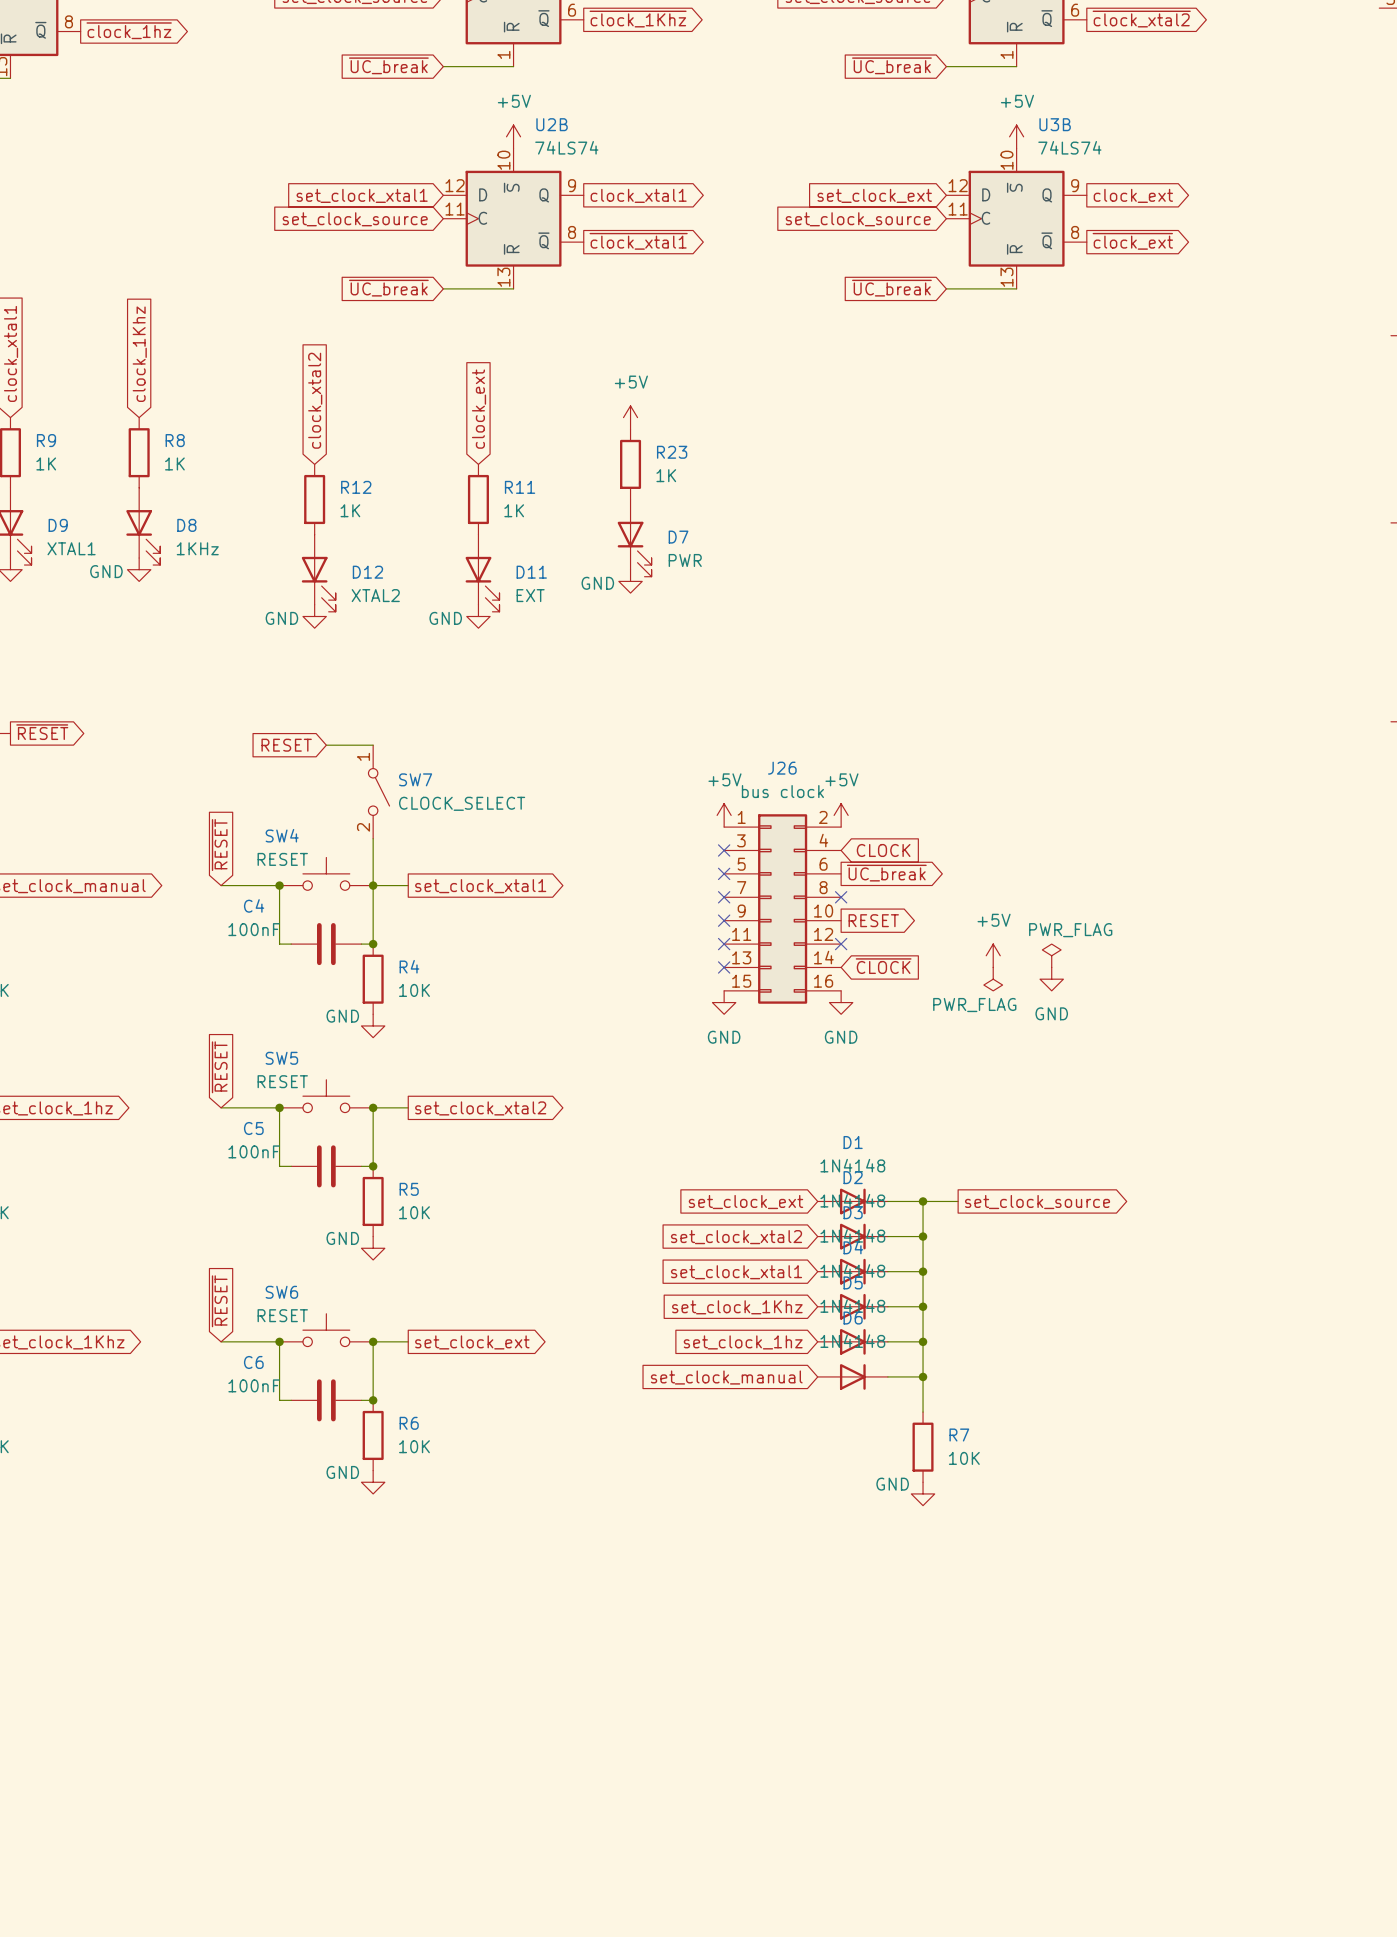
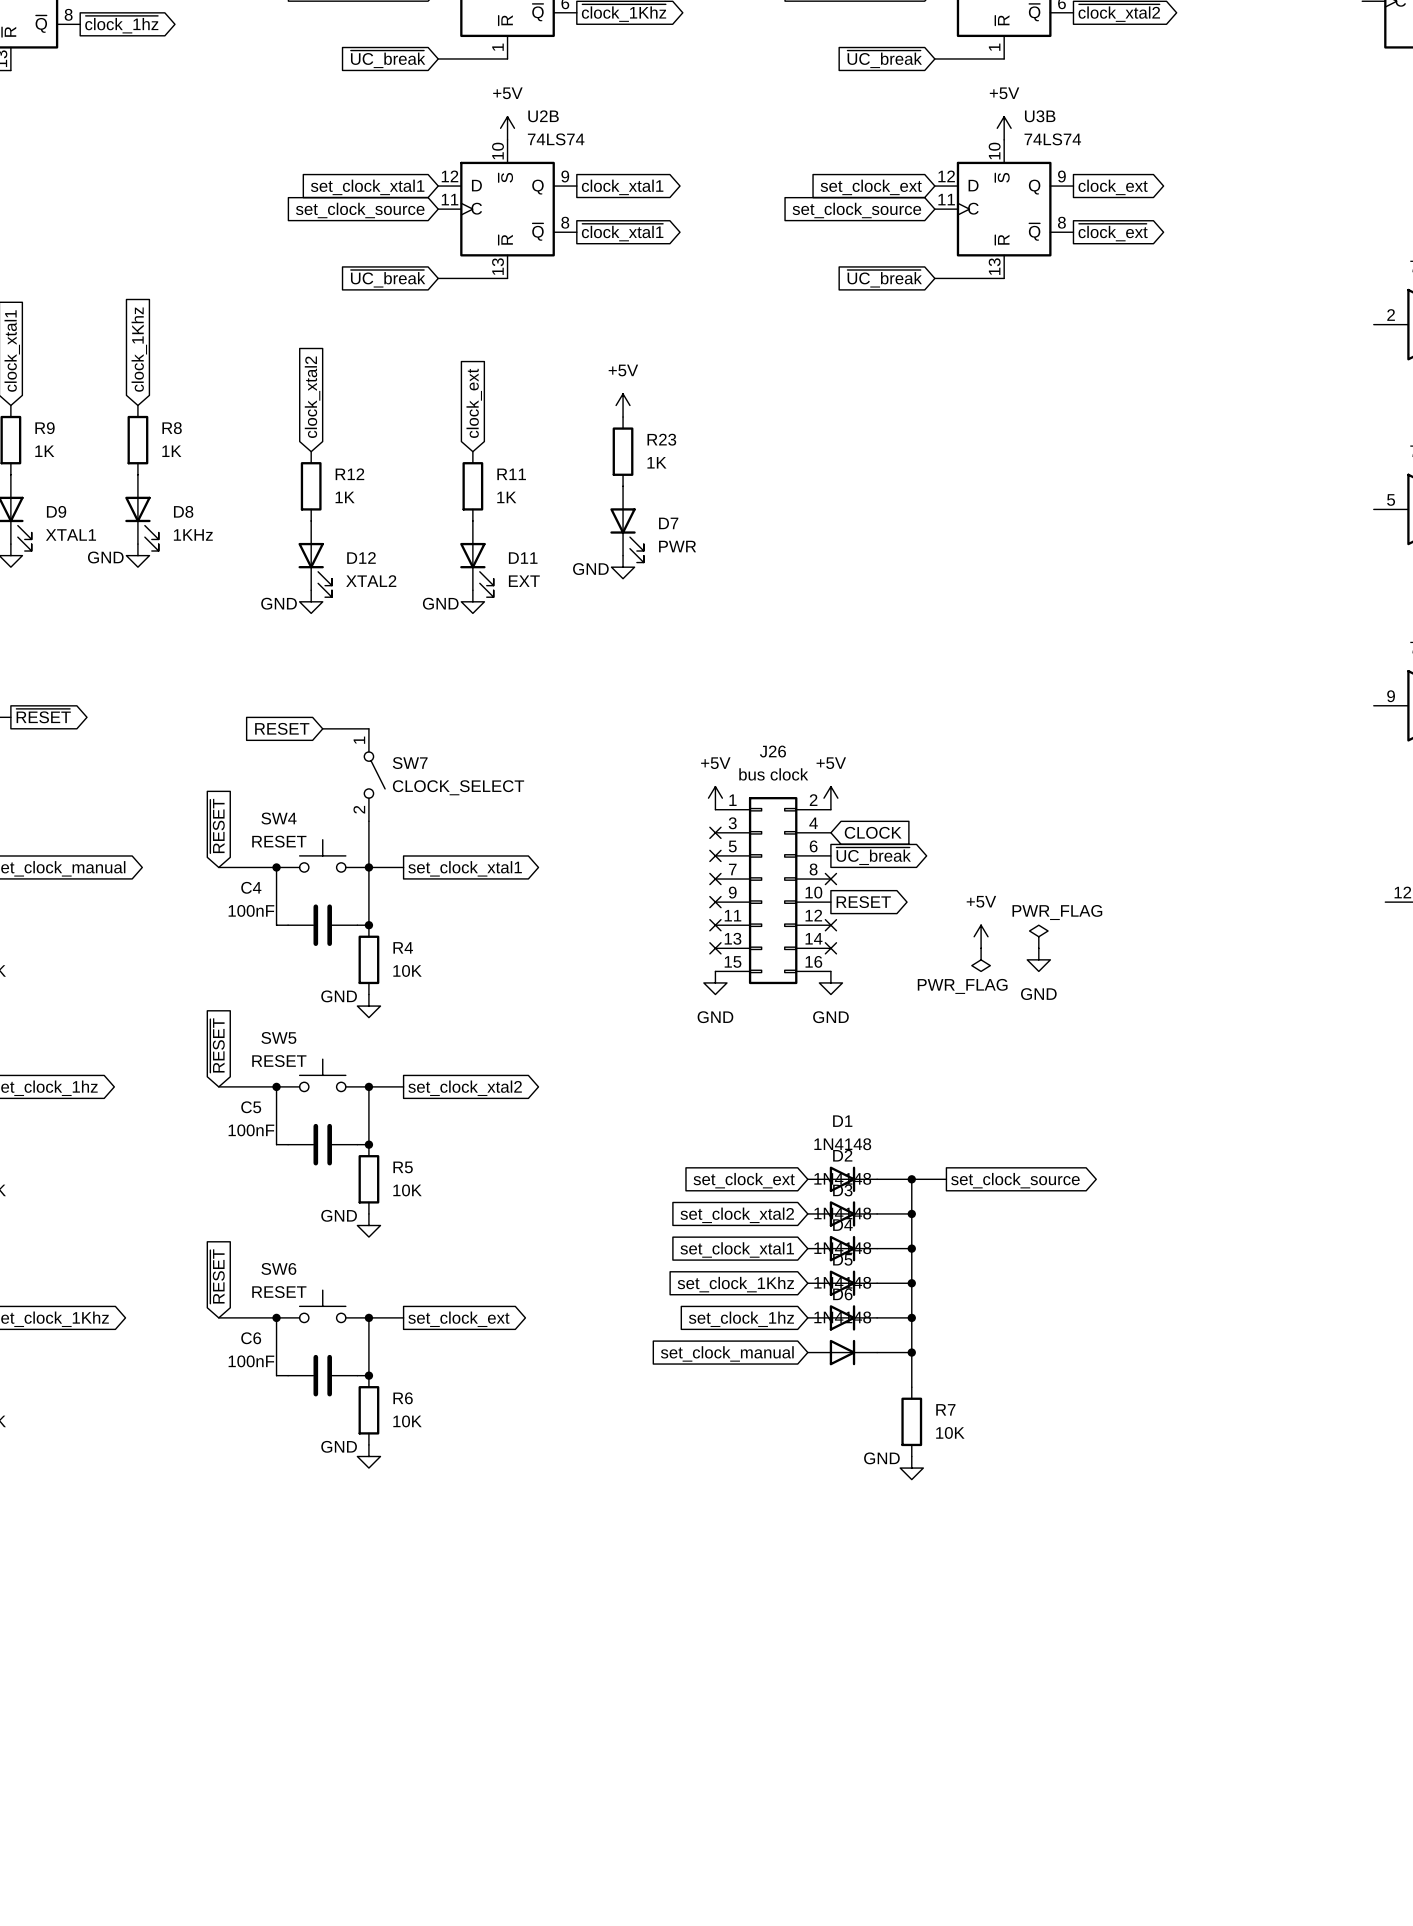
global label: ~{CLOCK} (883, 966) -> none
no-connect mark: none -> (830, 948)

